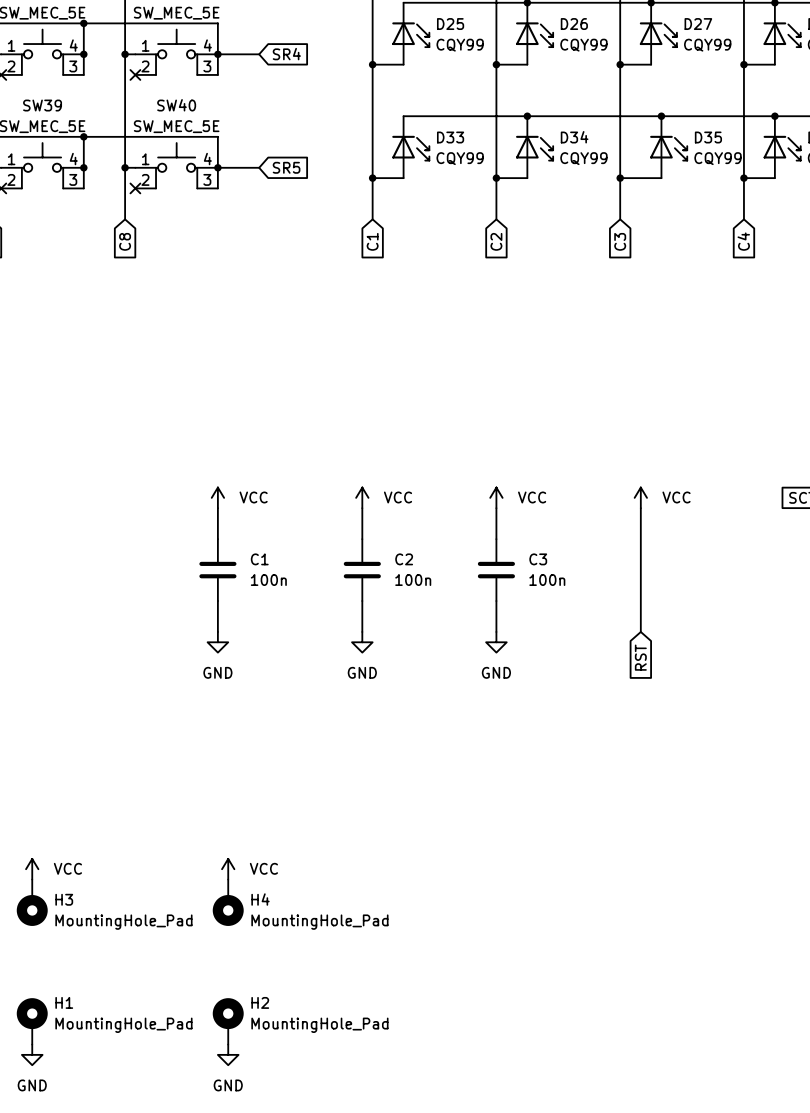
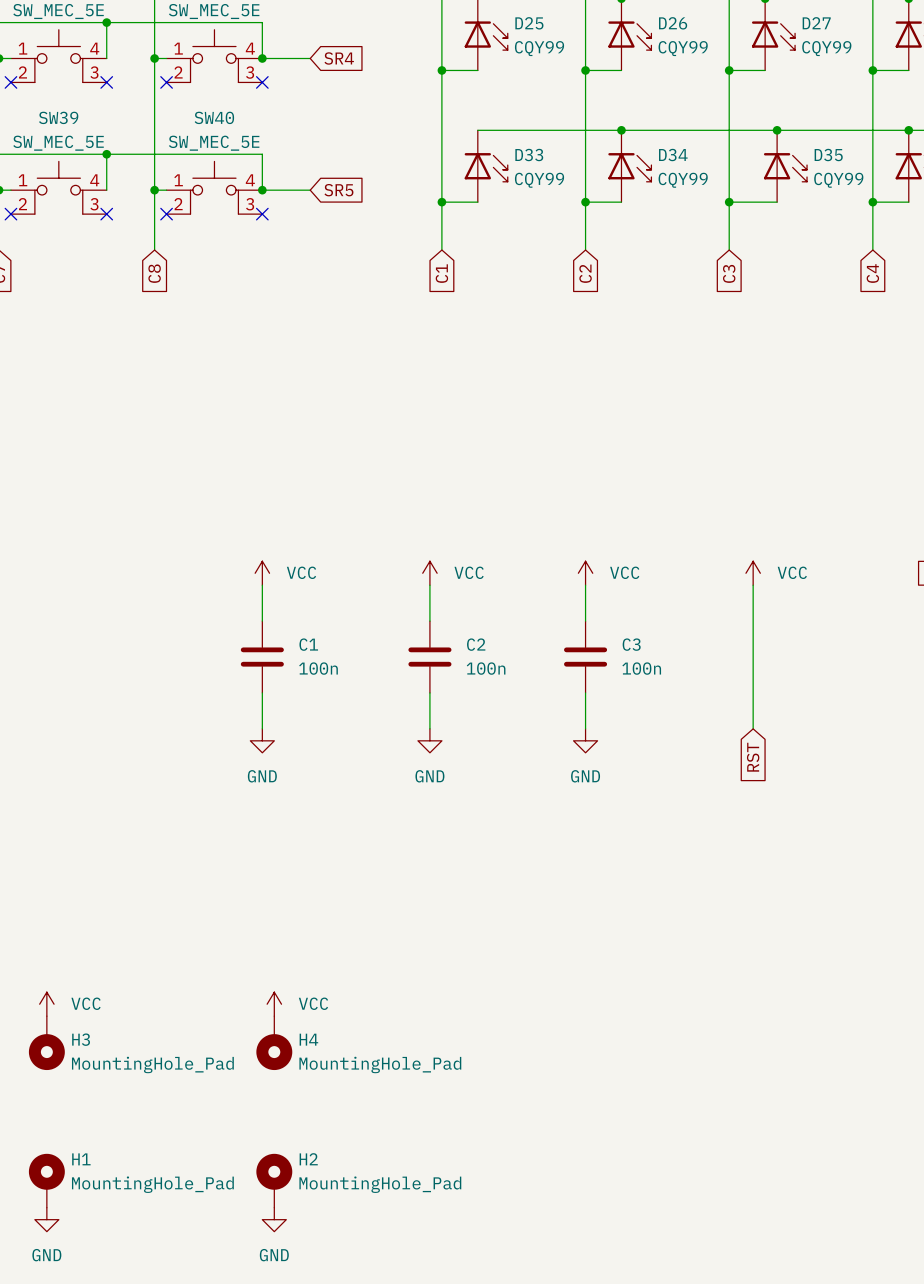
wire: (83, 54) (83, 74) -> none
junction: (83, 54) -> none
wire: (217, 54) (217, 74) -> none
no-connect mark: none -> (106, 82)
no-connect mark: none -> (262, 82)
wire: (83, 167) (83, 188) -> none
junction: (83, 167) -> none
wire: (217, 167) (217, 188) -> none
no-connect mark: none -> (106, 214)
no-connect mark: none -> (262, 214)

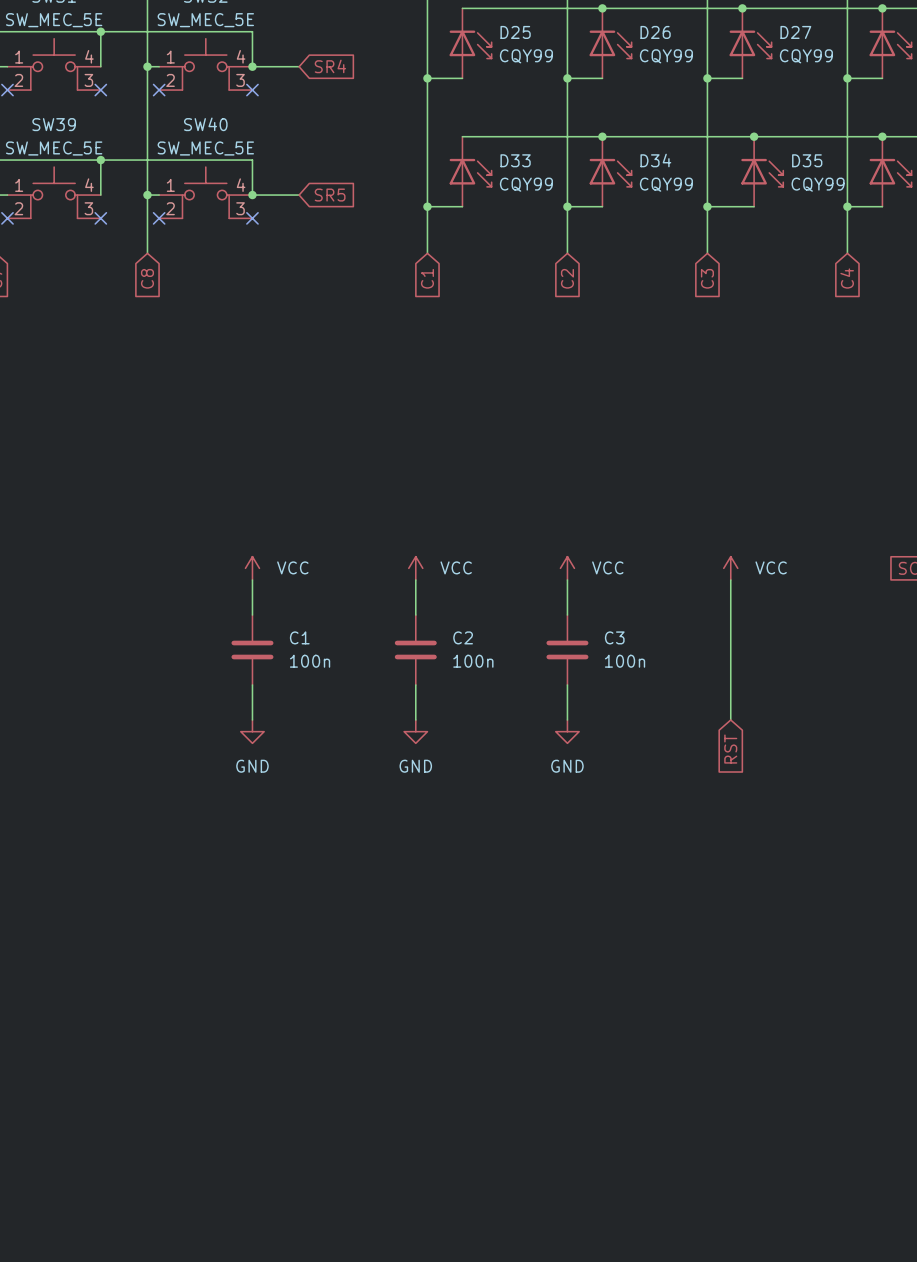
power symbol: VCC (46, 1004) -> none
power symbol: VCC (274, 1004) -> none
H3: MountingHole_Pad (46, 1043) -> none
H4: MountingHole_Pad (274, 1043) -> none
H1: MountingHole_Pad (46, 1180) -> none
H2: MountingHole_Pad (274, 1180) -> none
power symbol: GND (46, 1219) -> none
power symbol: GND (274, 1219) -> none

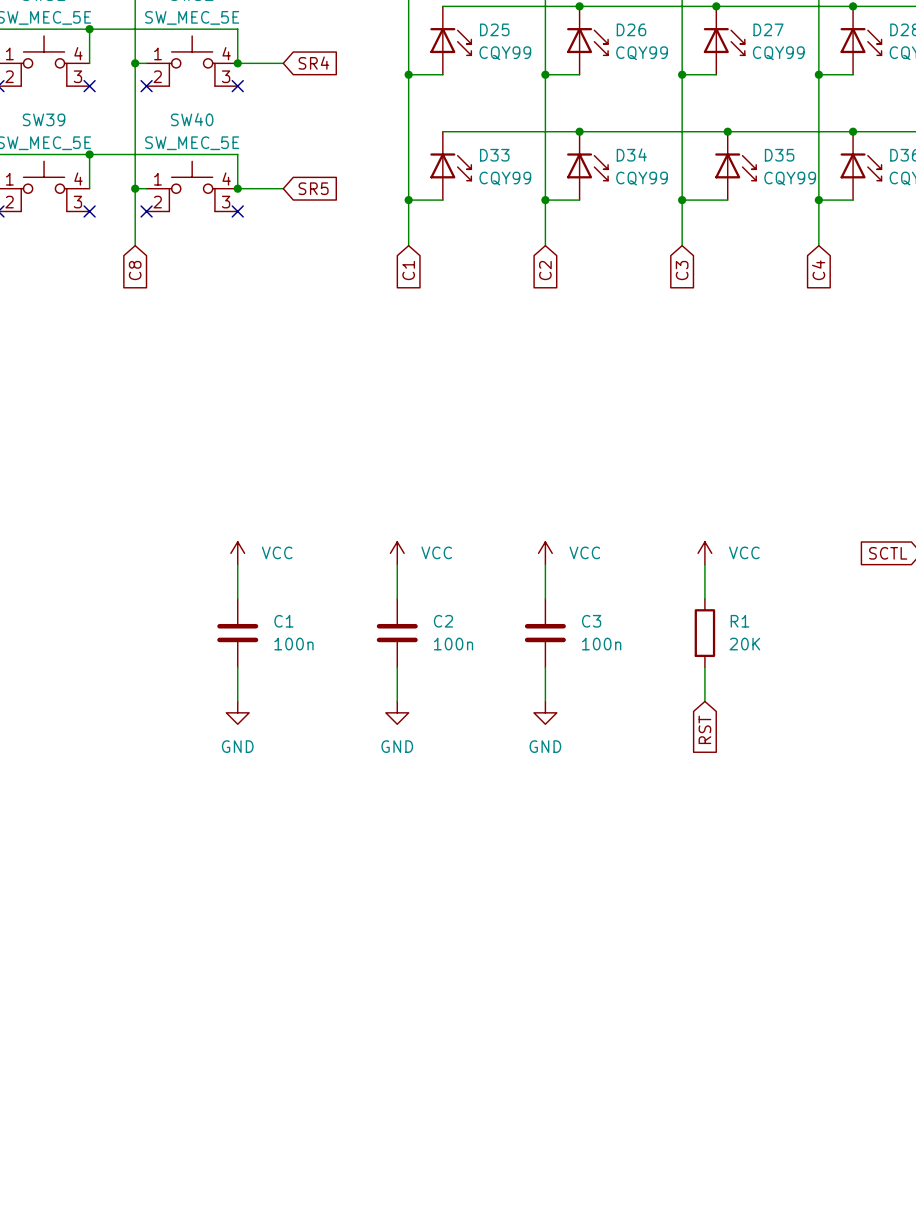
wire: (730, 615) (730, 685) -> none
R1: none -> 20K (704, 633)

